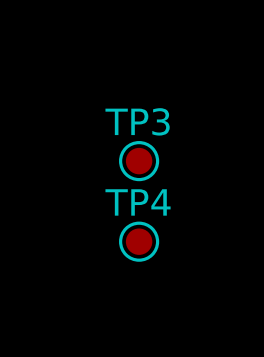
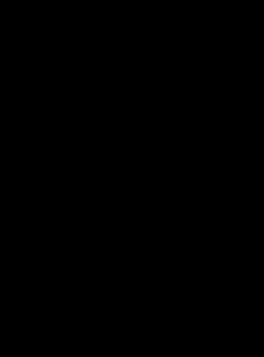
TP3: (139, 161) -> none
TP4: (139, 241) -> none

